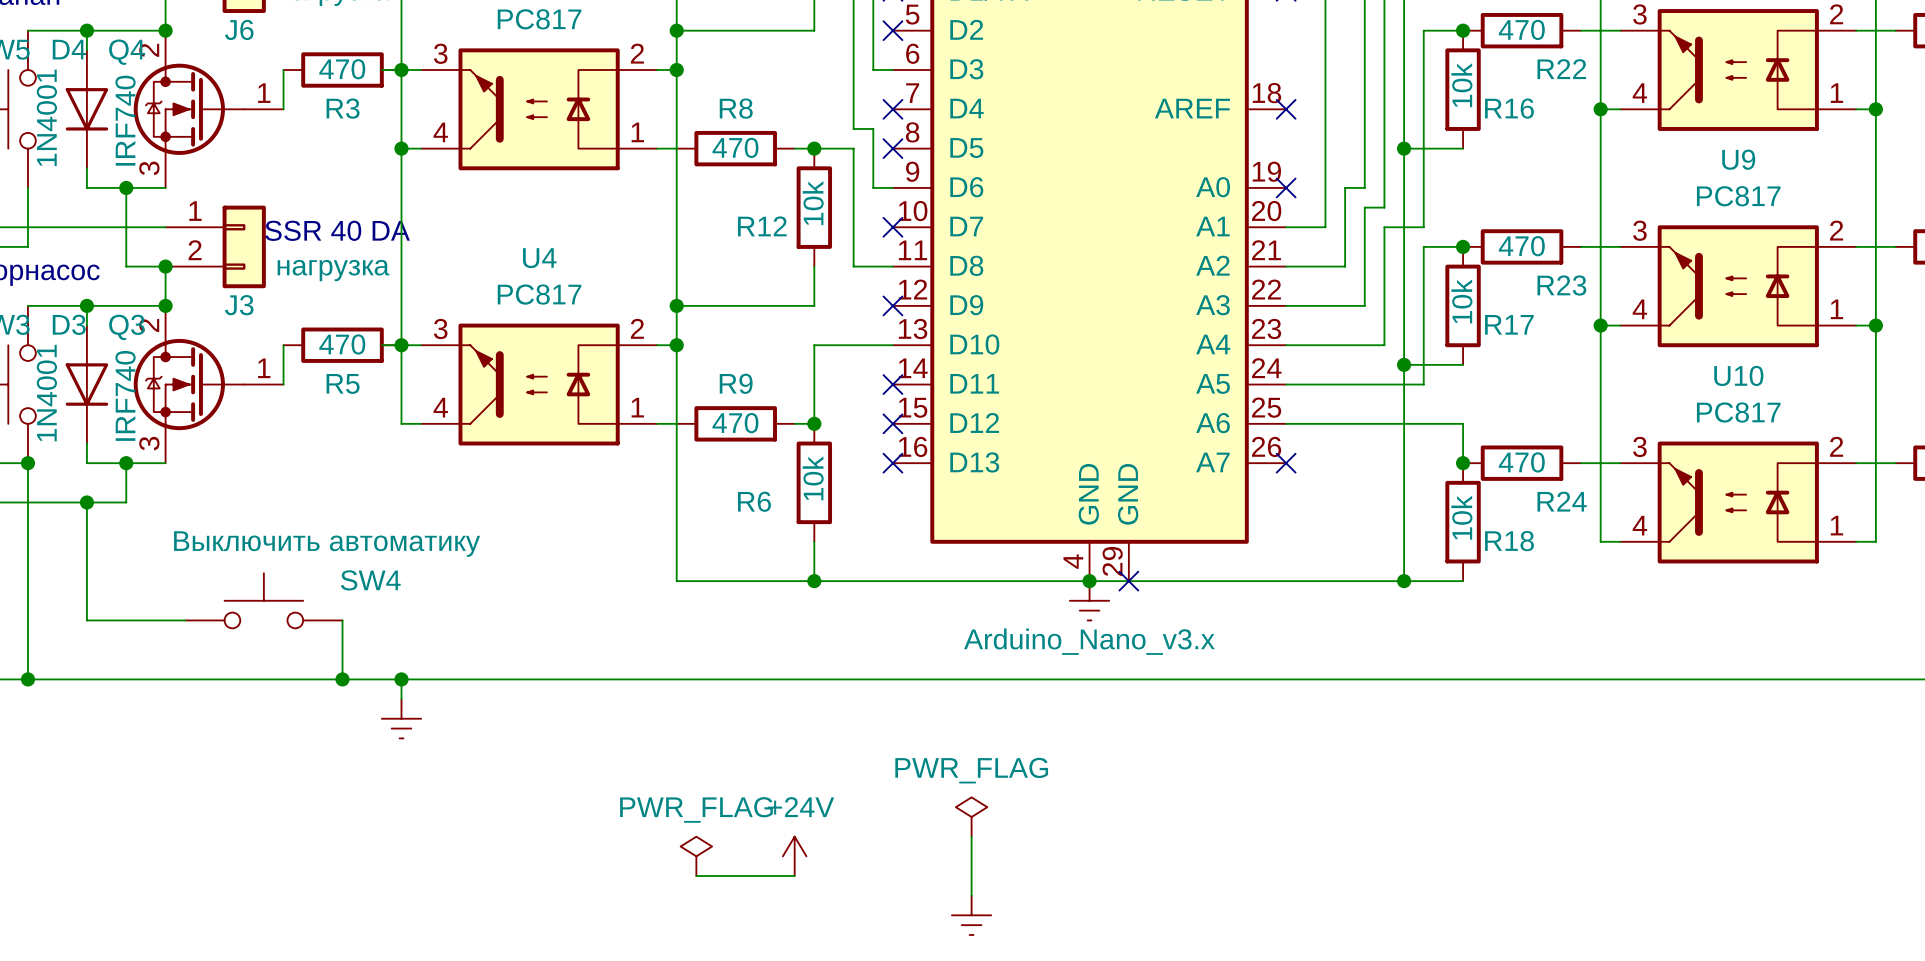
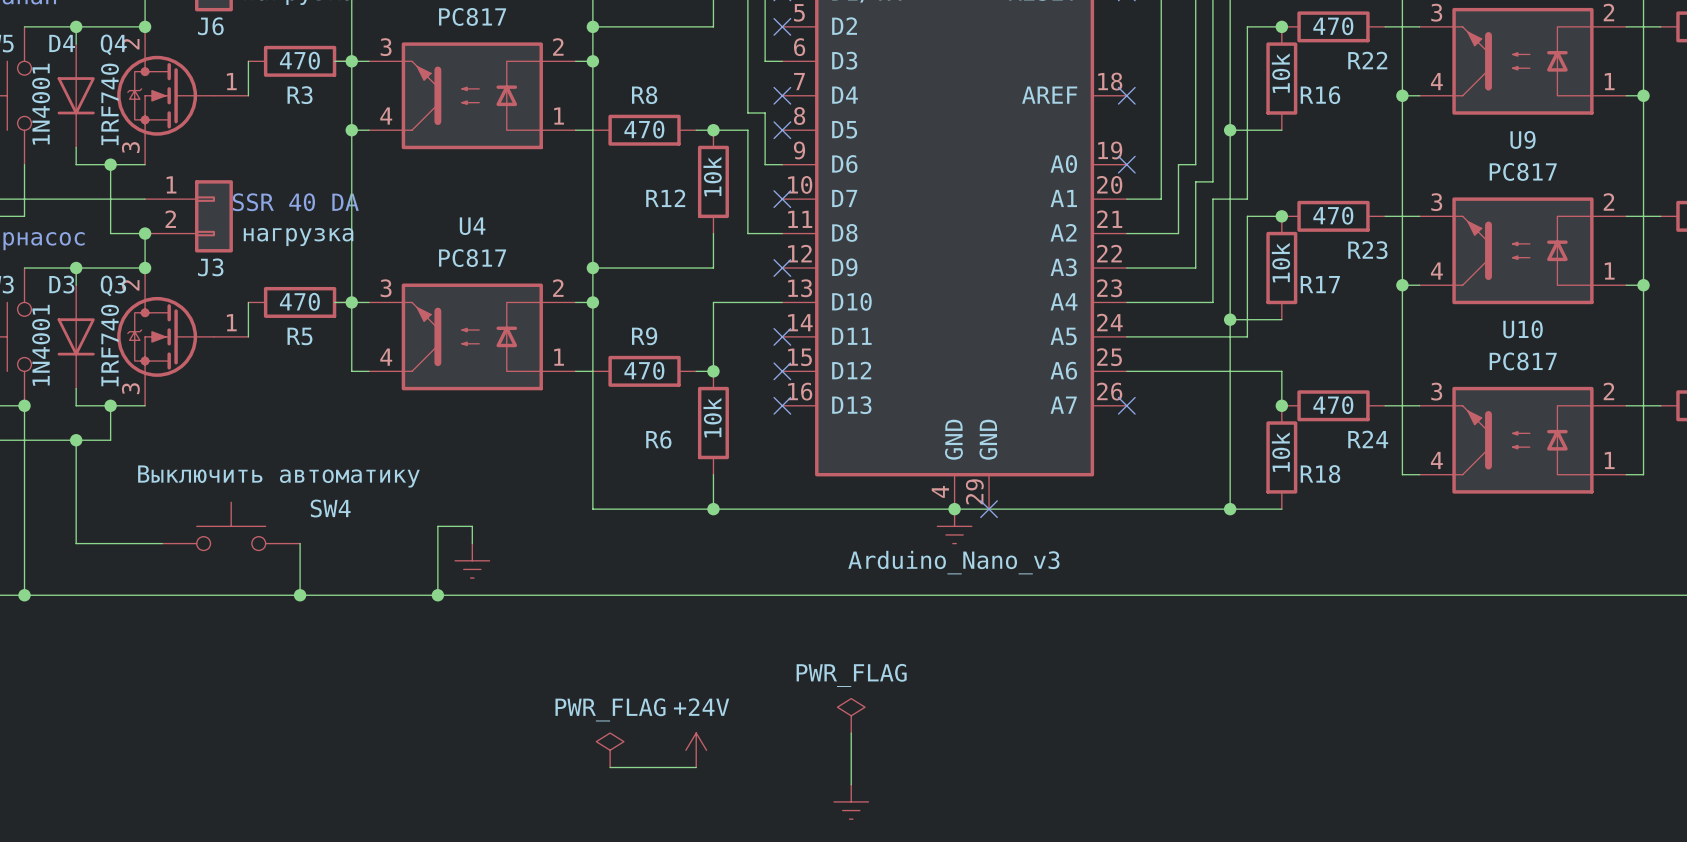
wire: none -> (472, 543) (472, 526) (437, 526) (437, 595)
part value: Arduino_Nano_v3.x (1089, 641) -> Arduino_Nano_v3 (953, 562)
wire: (401, 679) (401, 699) -> none
junction: (401, 679) -> none
junction: none -> (437, 595)
power symbol position: (401, 718) -> (472, 560)

